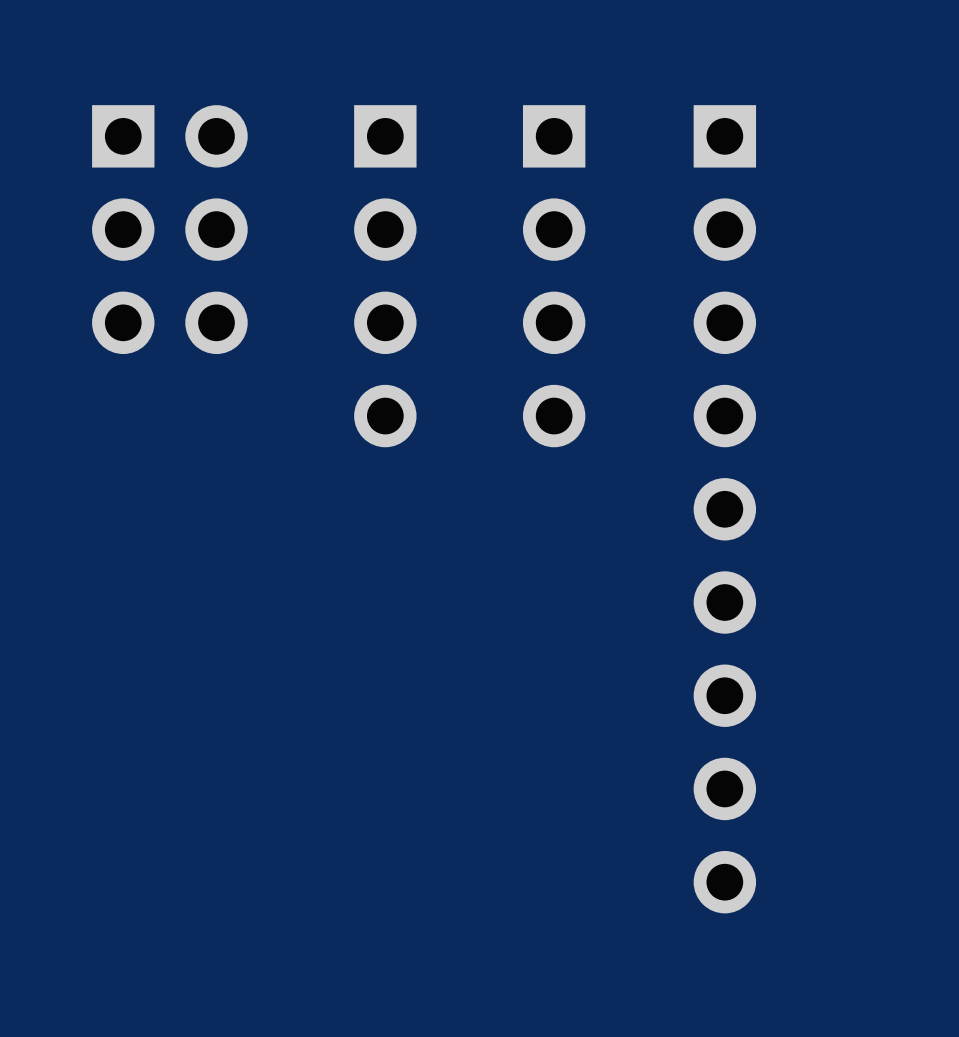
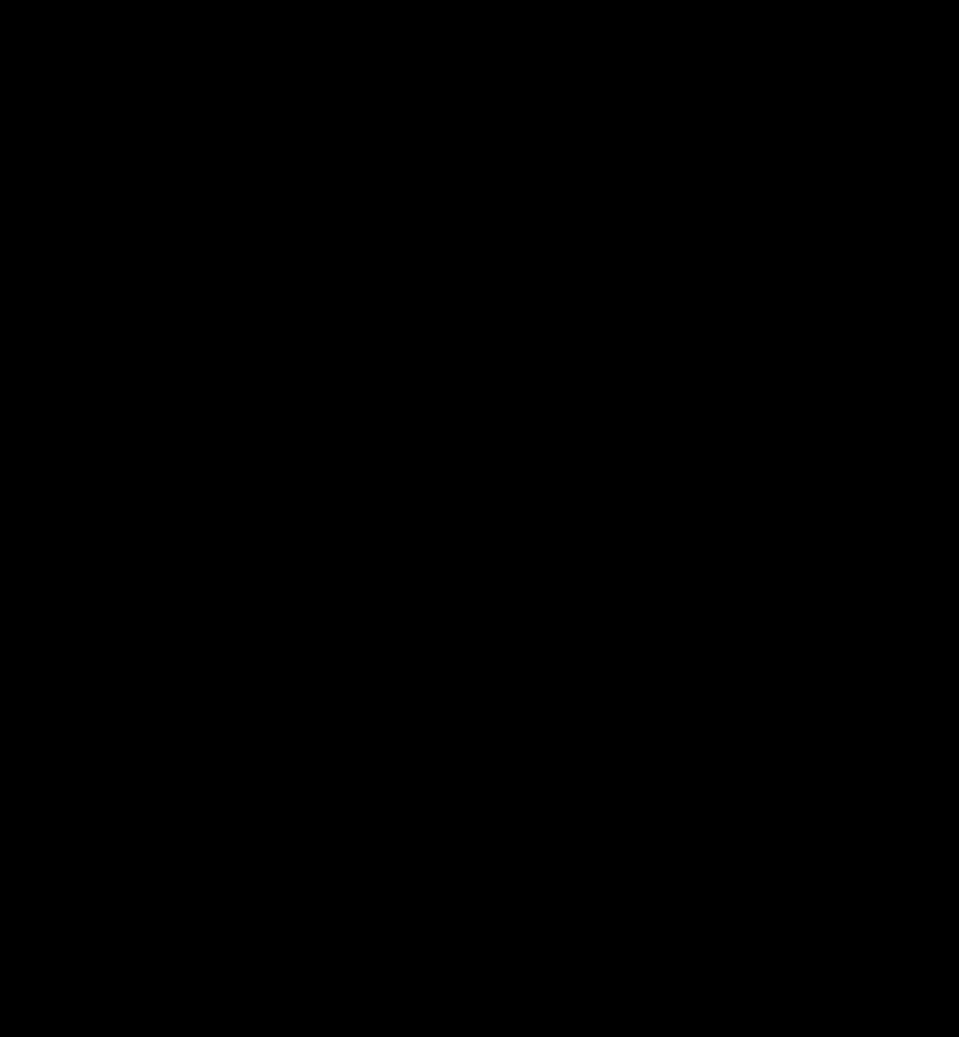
part: (169, 229) -> none
part: (385, 276) -> none
part: (554, 276) -> none
part: (724, 509) -> none

